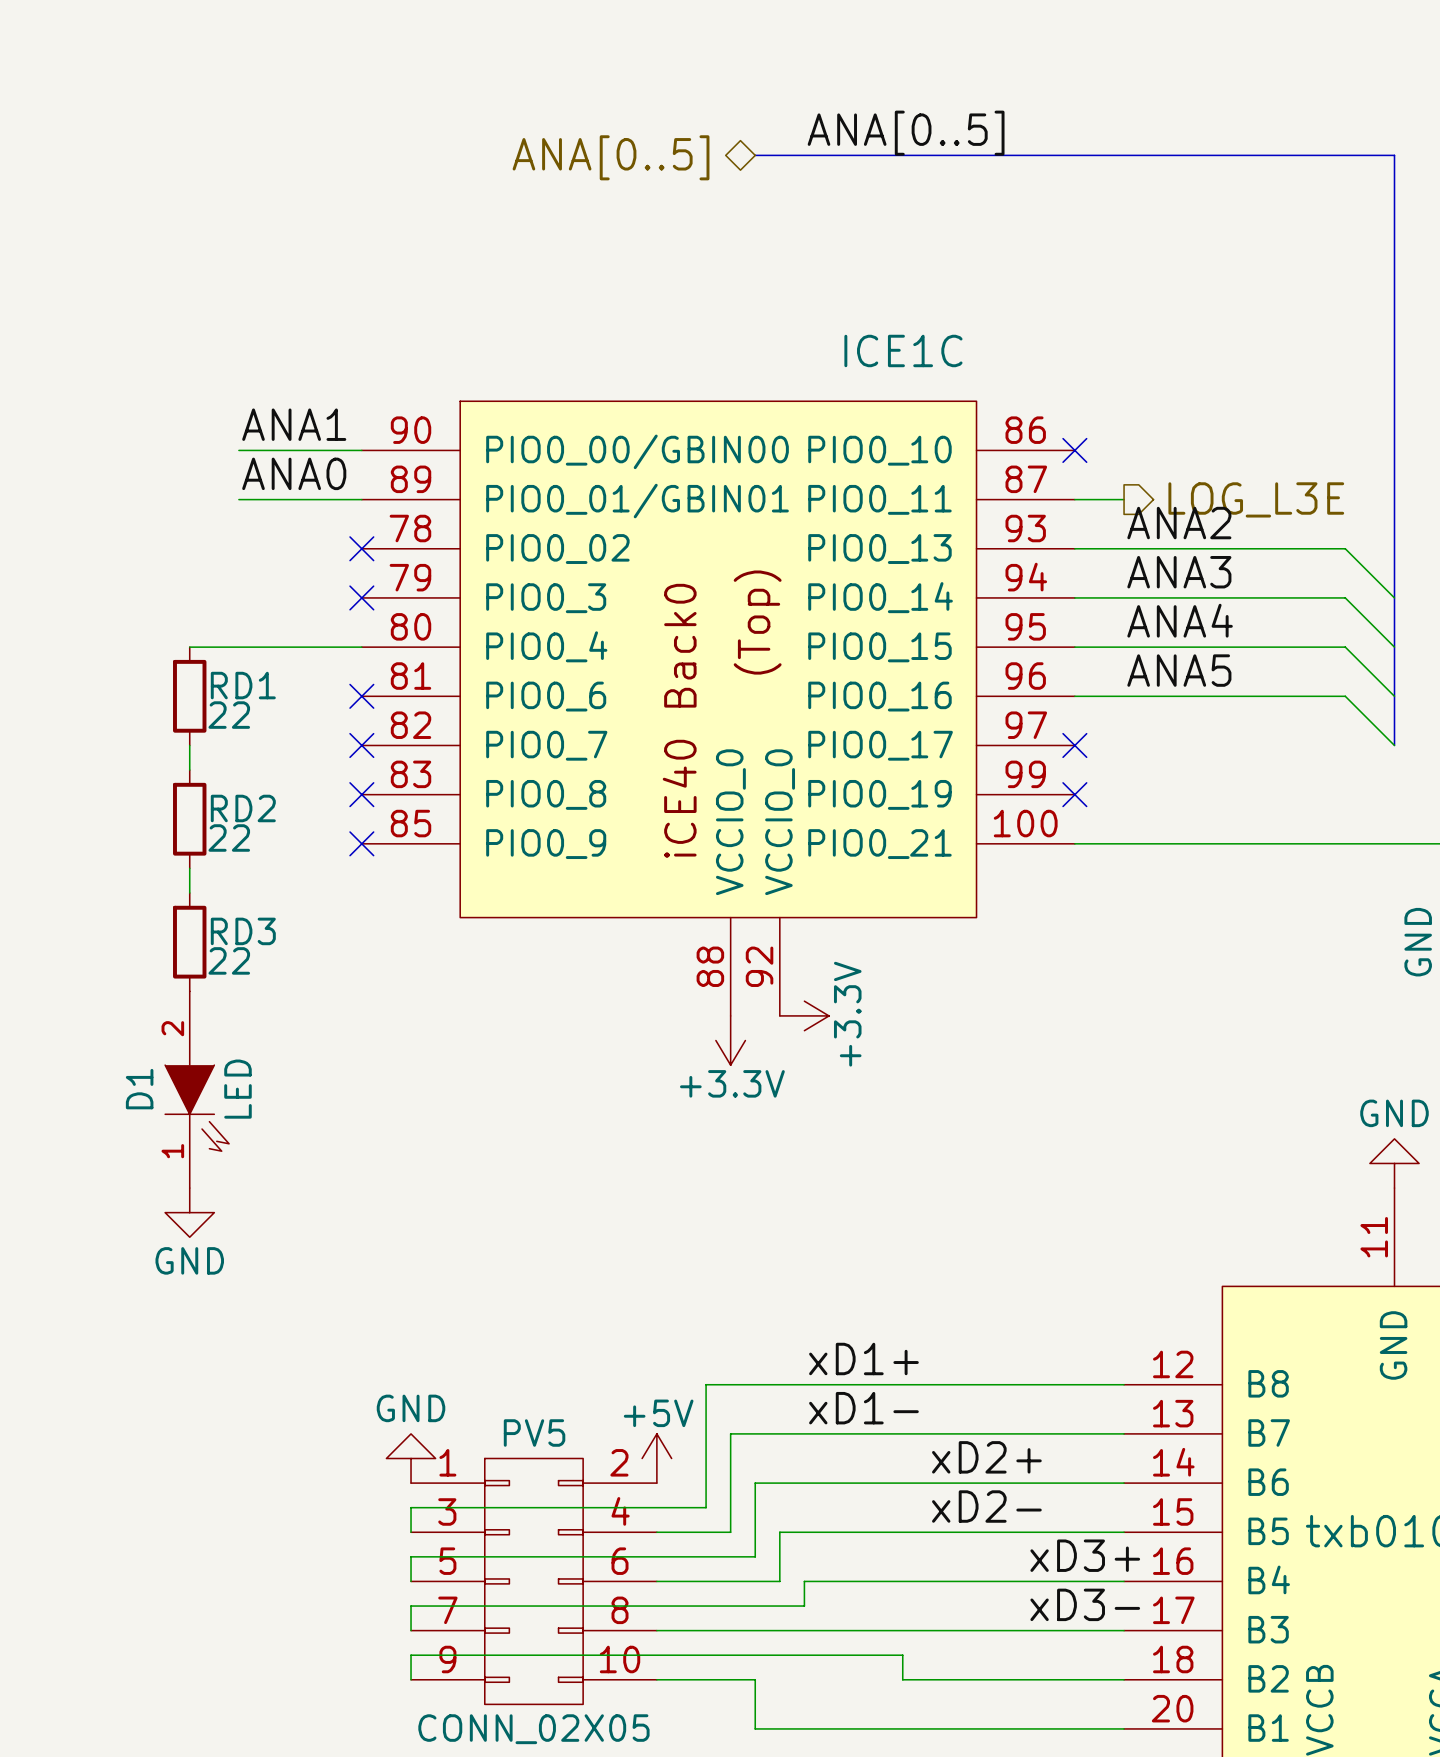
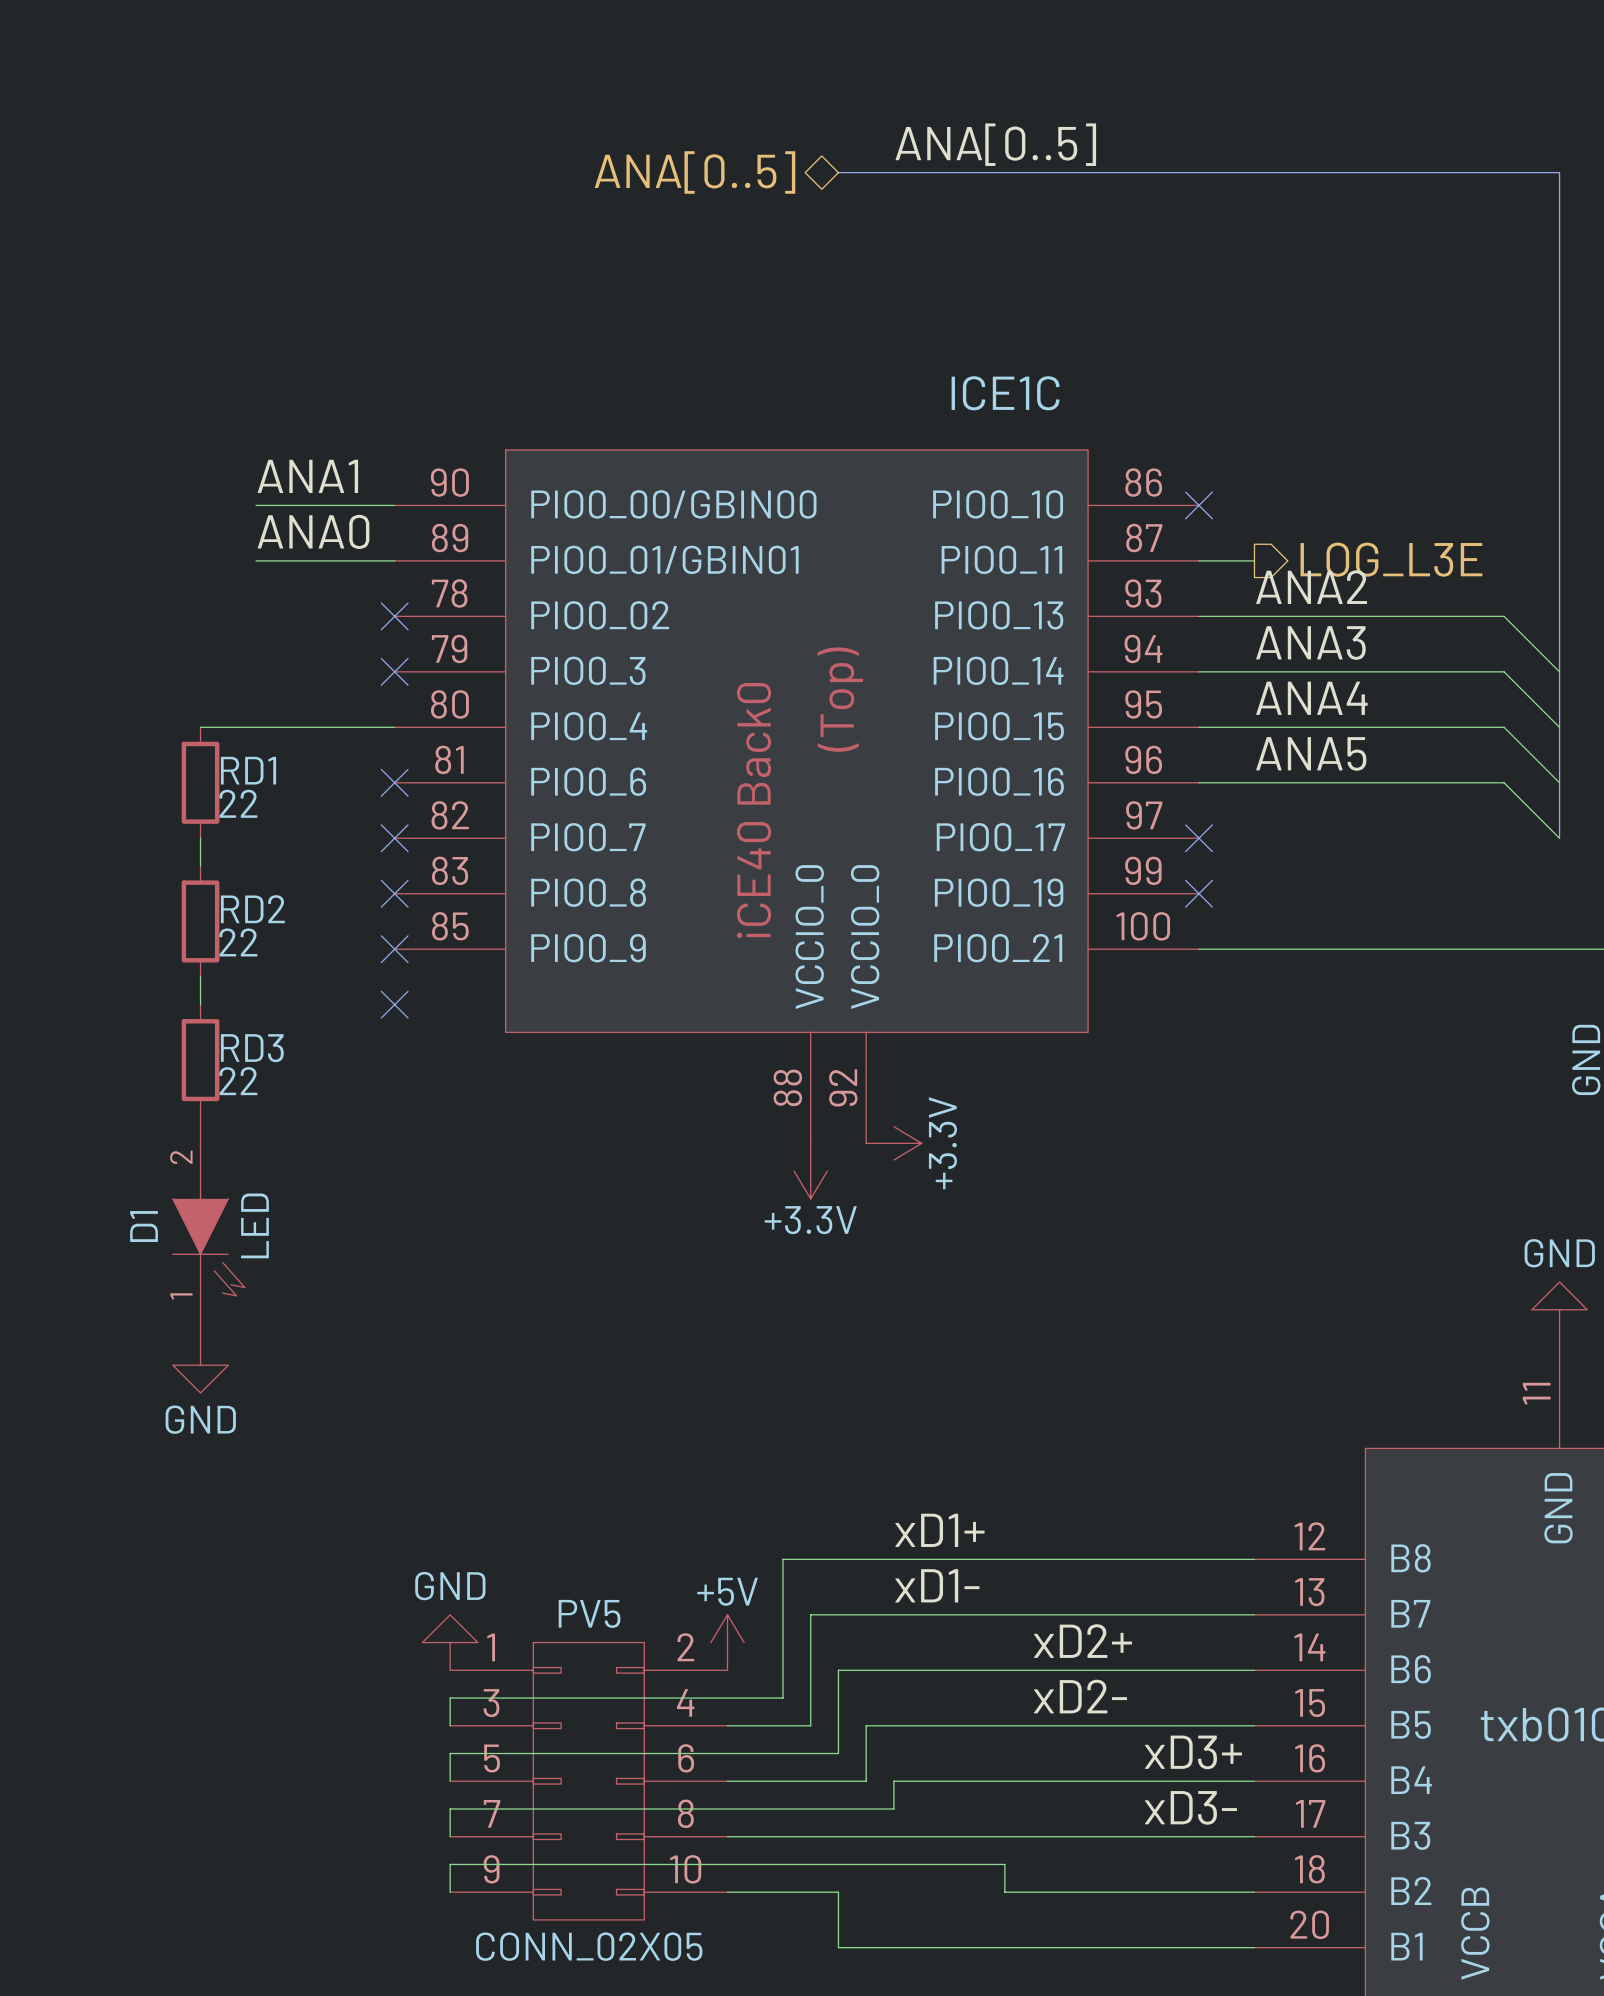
no-connect mark: none -> (394, 1004)

